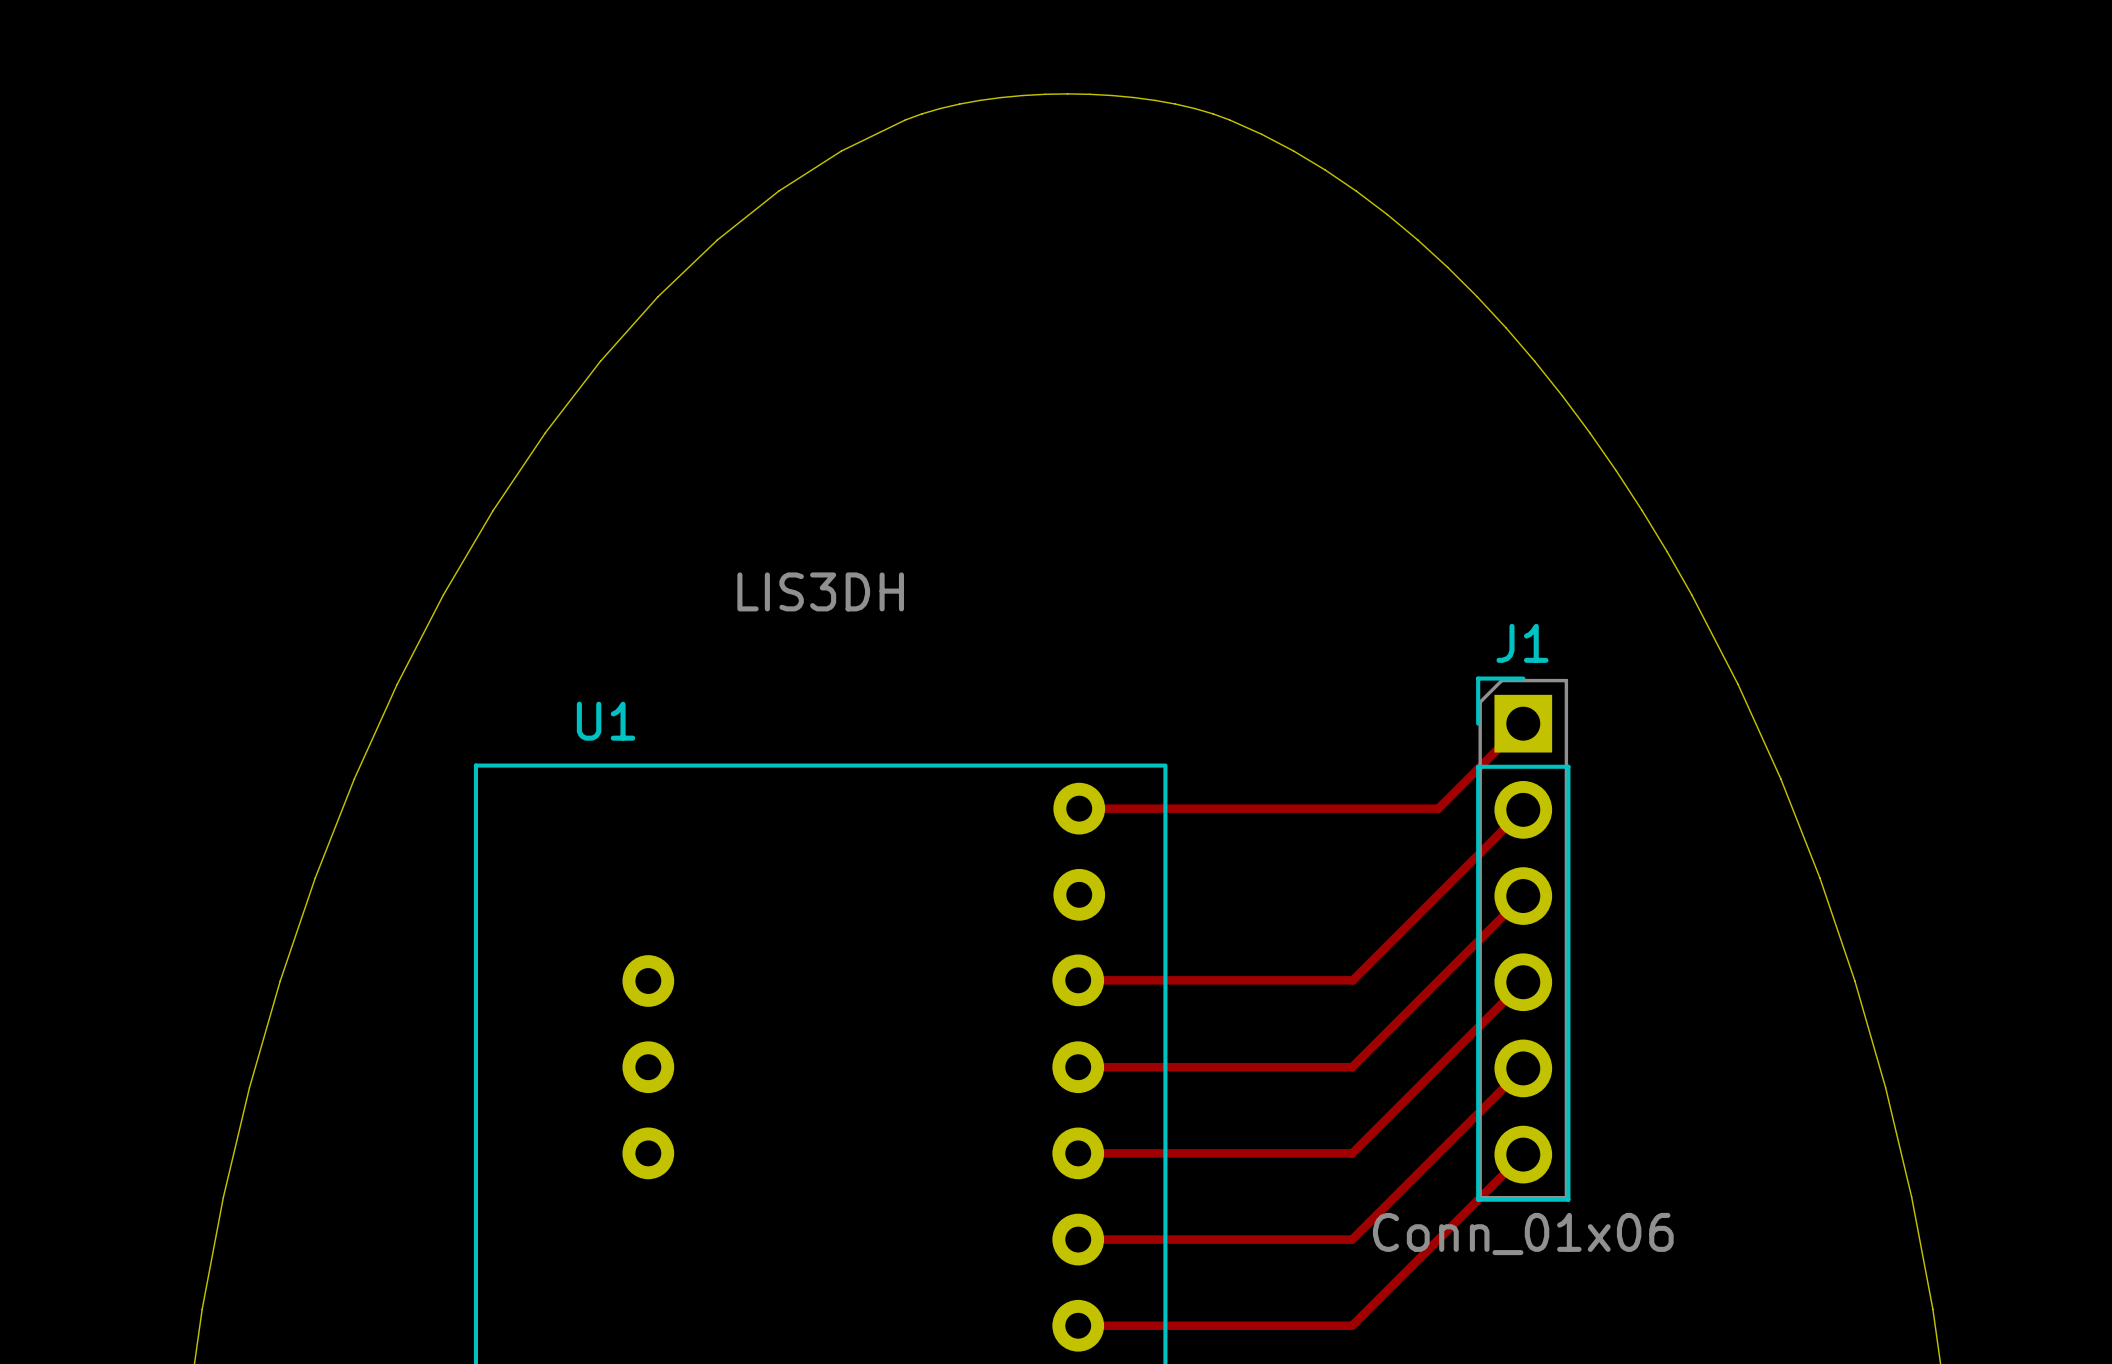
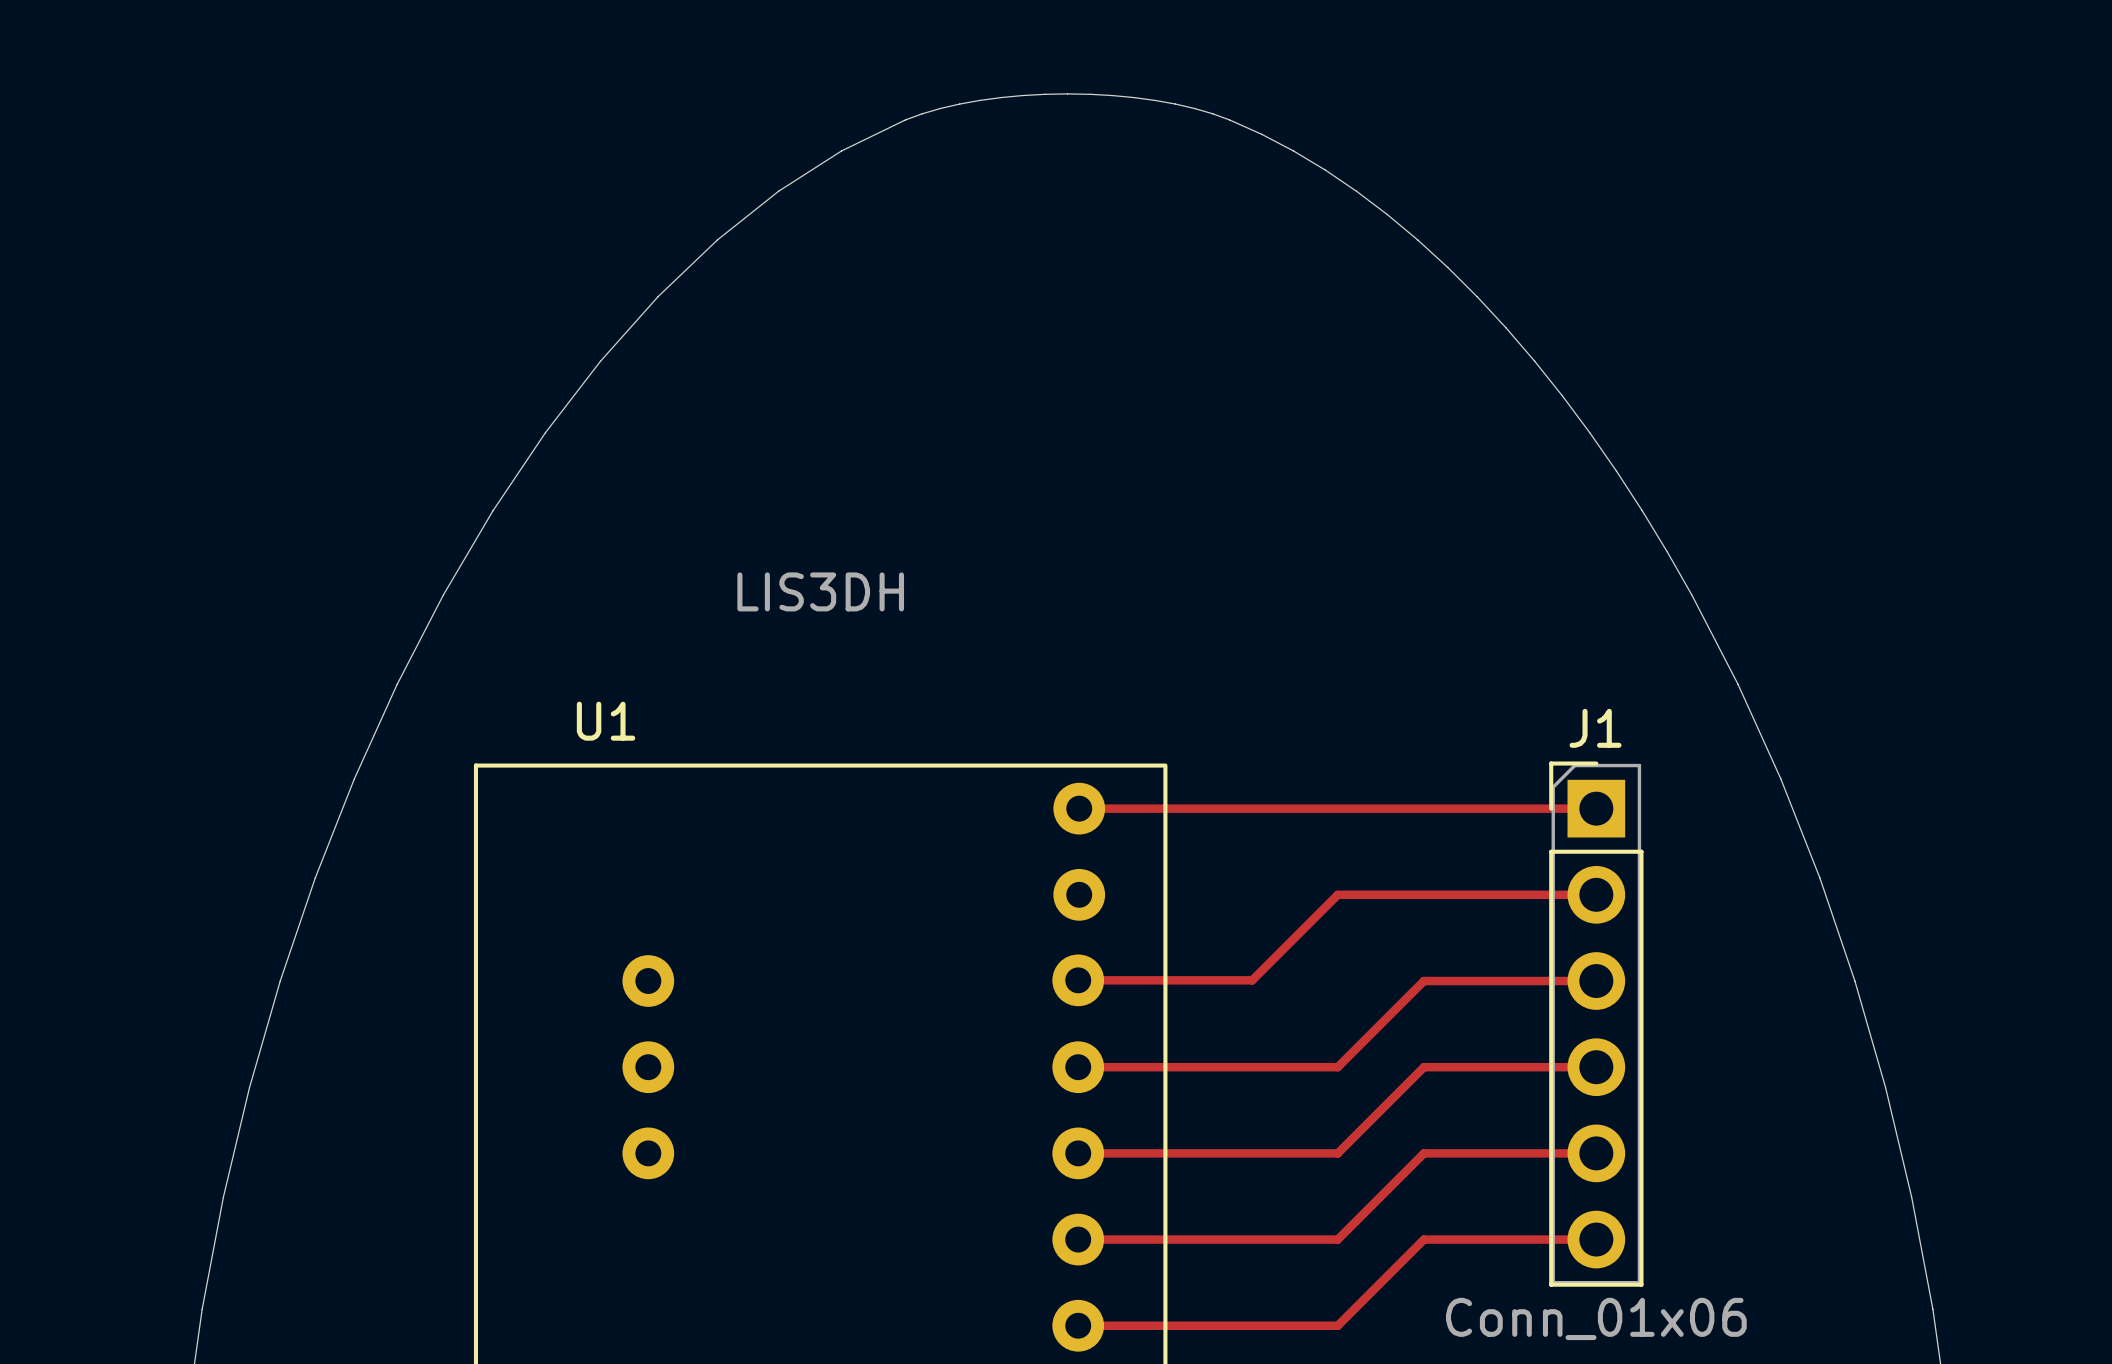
track: (1523, 723) (1438, 808) -> (1596, 808) (1438, 808)
track: (1523, 809) (1352, 980) (1252, 980) -> (1596, 894) (1337, 894) (1252, 980)
track: (1523, 896) (1352, 1067) (1337, 1067) -> (1596, 981) (1423, 981) (1337, 1067)
J1 position: (1523, 939) -> (1596, 1024)
track: (1523, 982) (1352, 1153) (1337, 1153) -> (1596, 1067) (1423, 1067) (1337, 1153)
track: (1523, 1068) (1352, 1239) (1337, 1239) -> (1596, 1153) (1423, 1153) (1337, 1239)
track: (1523, 1154) (1352, 1325) (1337, 1325) -> (1596, 1239) (1423, 1239) (1337, 1325)

